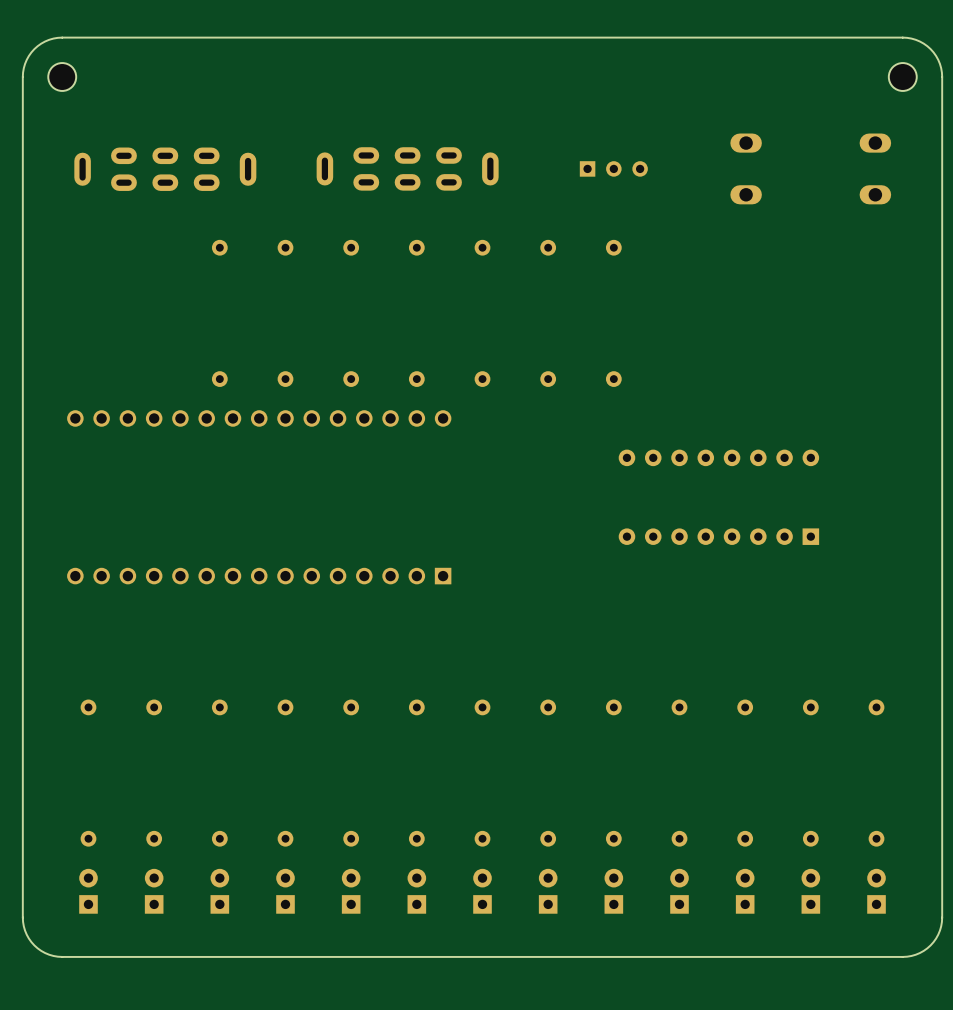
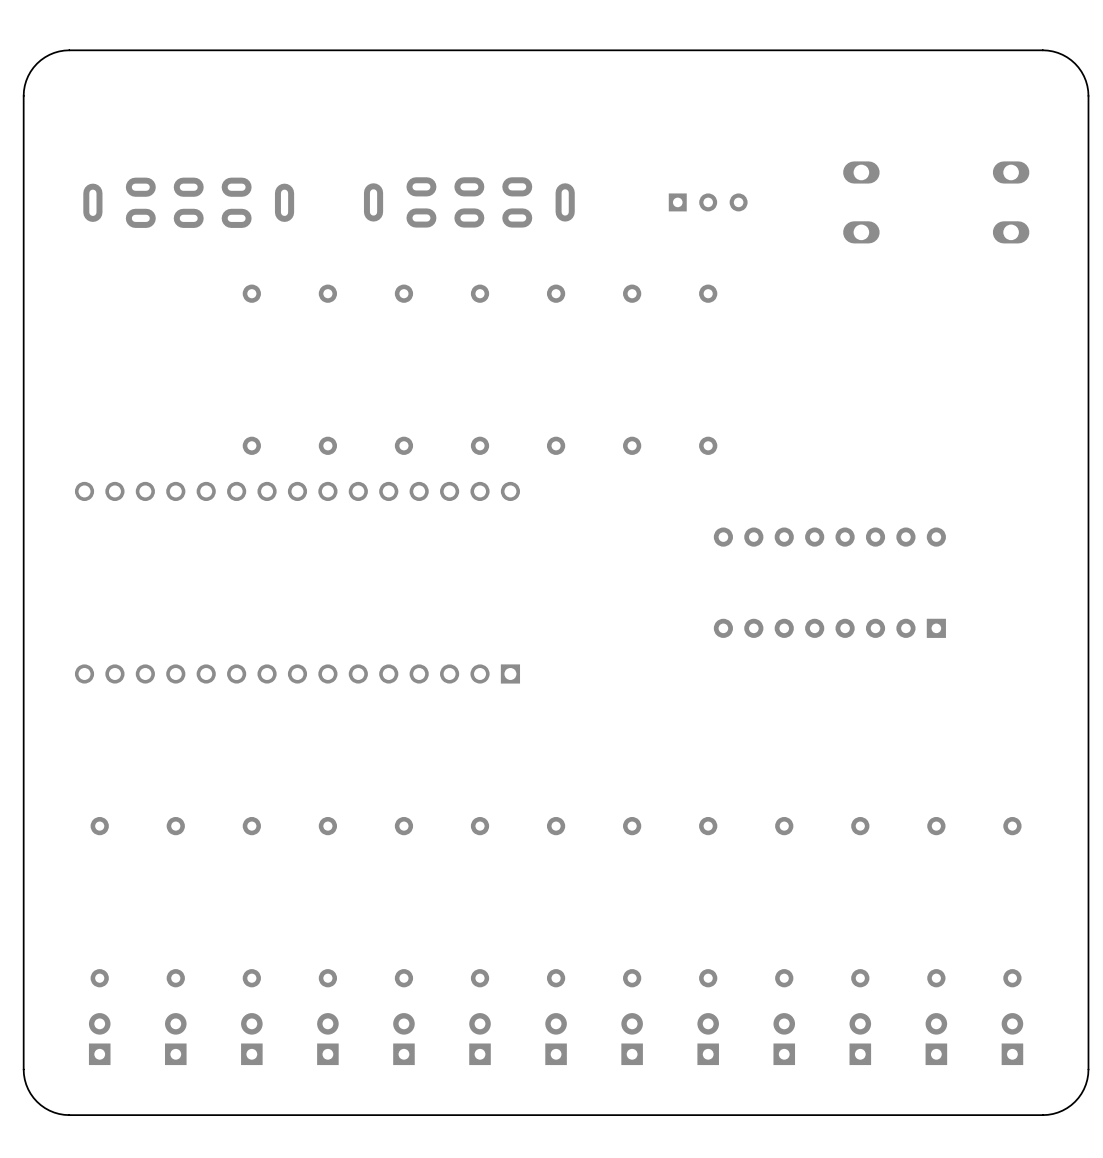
part: (62, 76) -> none
part: (902, 76) -> none

